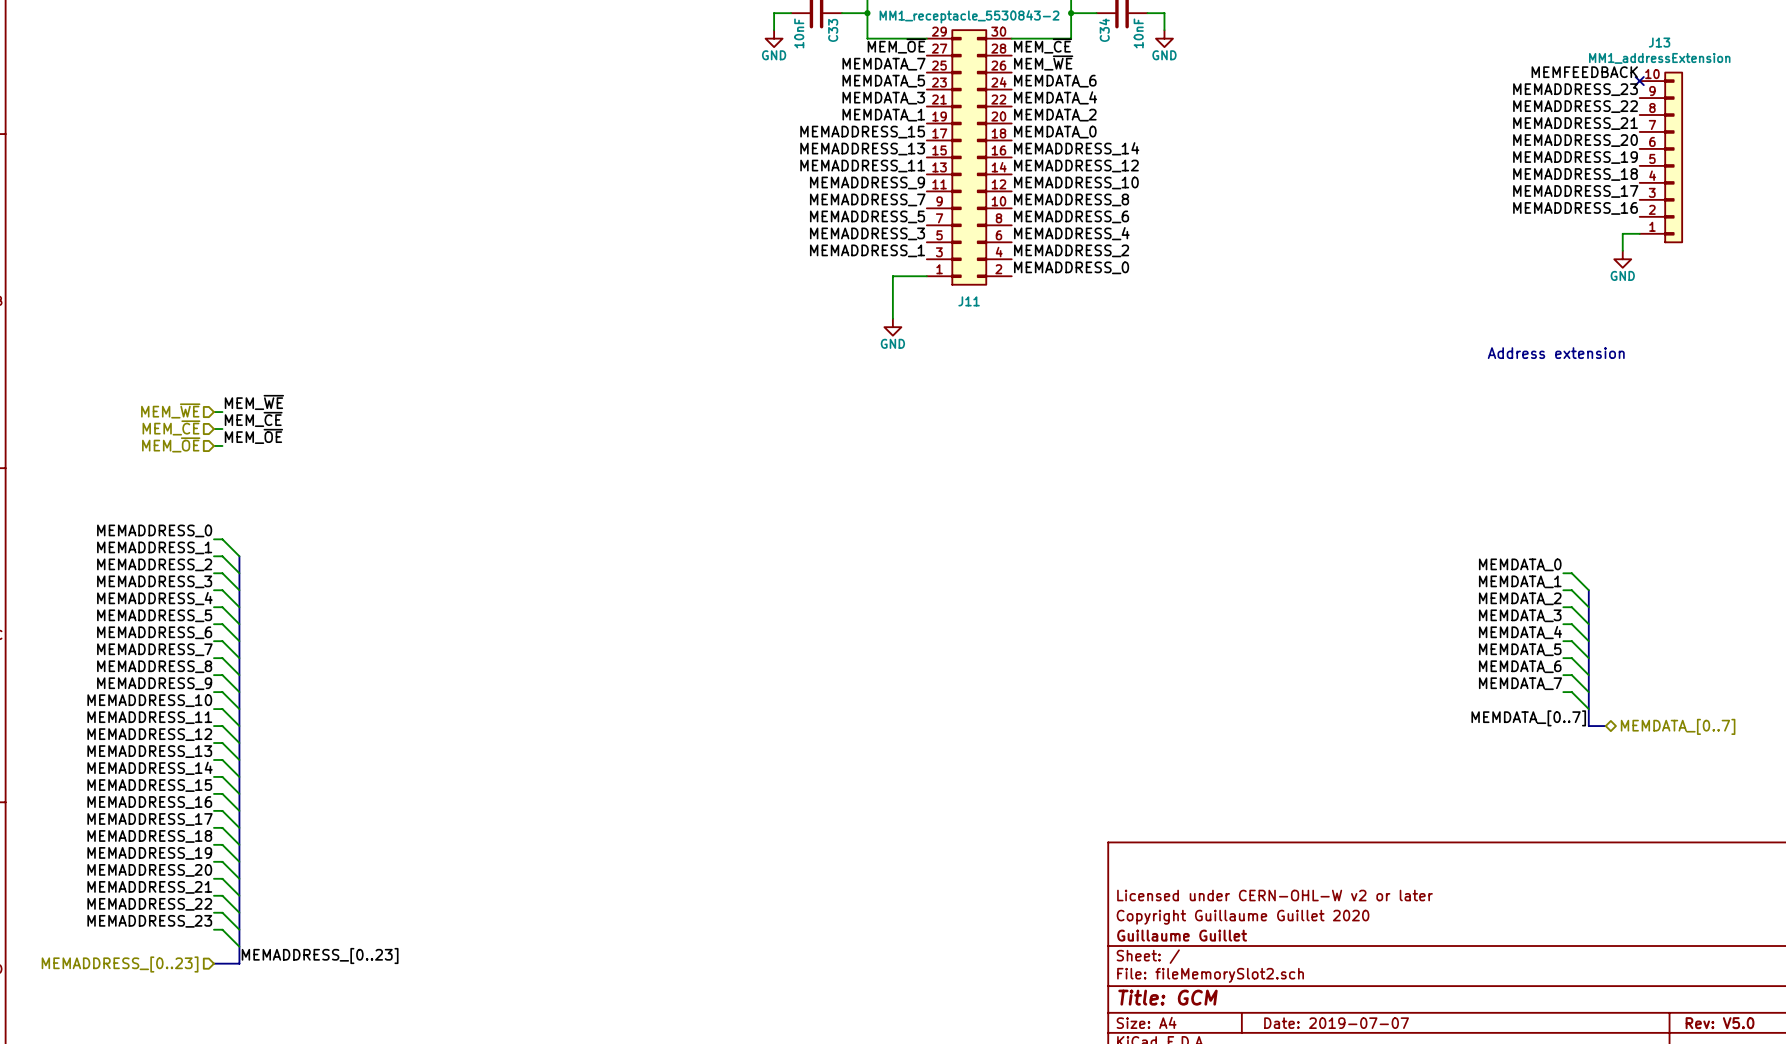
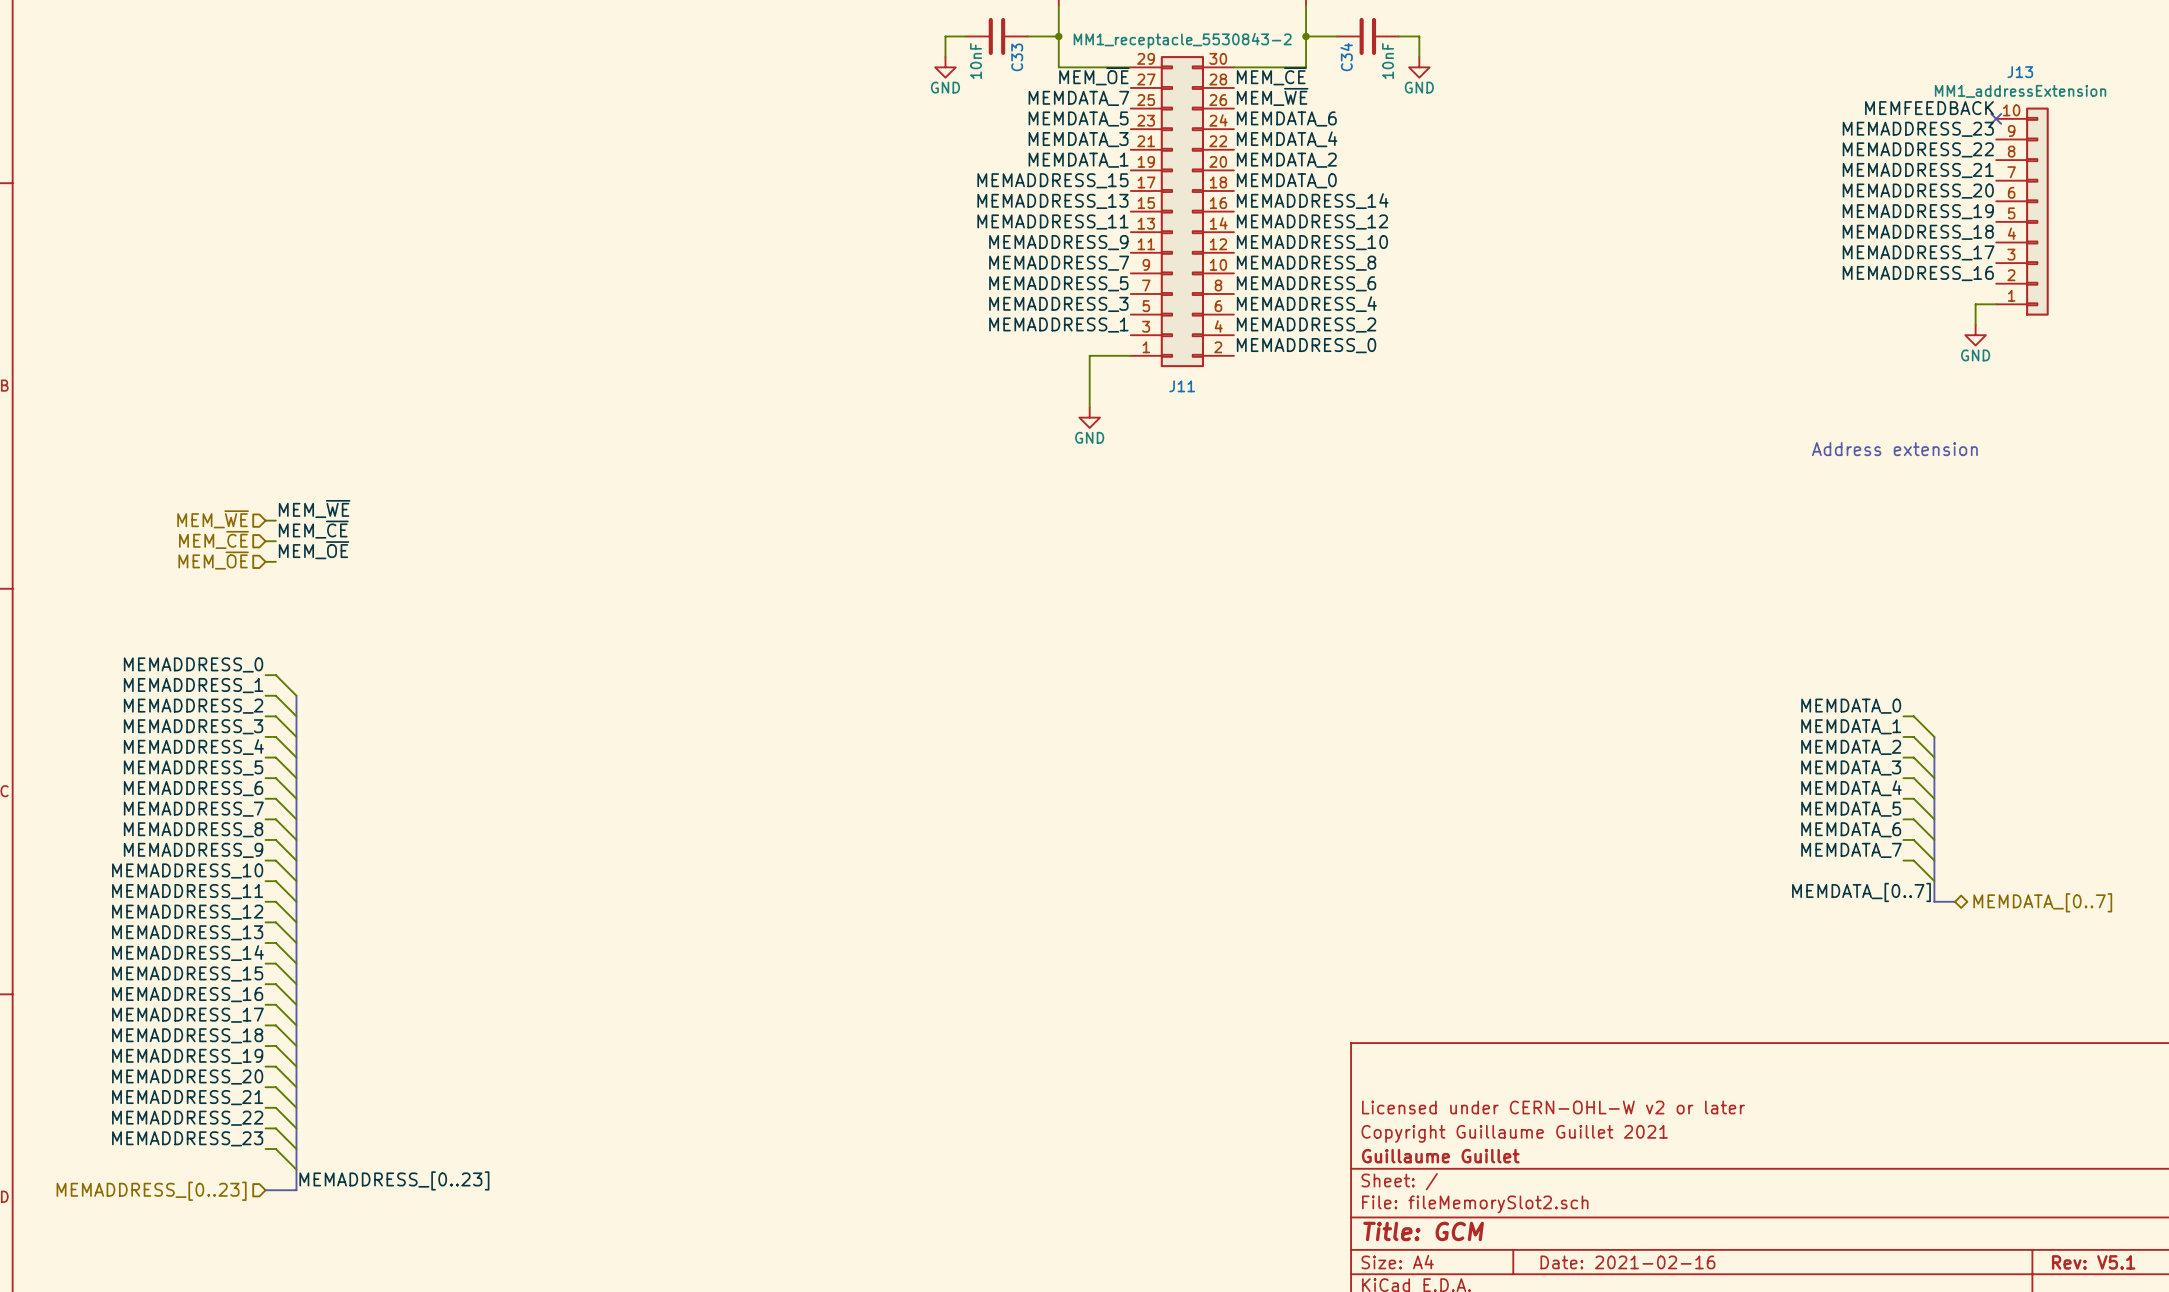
title block: Copyright Guillaume Guillet 2020 (1243, 917) -> Copyright Guillaume Guillet 2021 (1514, 1133)
title block: Date: 2019-07-07 (1336, 1023) -> Date: 2021-02-16 (1627, 1262)
title block: Rev: V5.0 (1720, 1023) -> Rev: V5.1 (2093, 1262)

